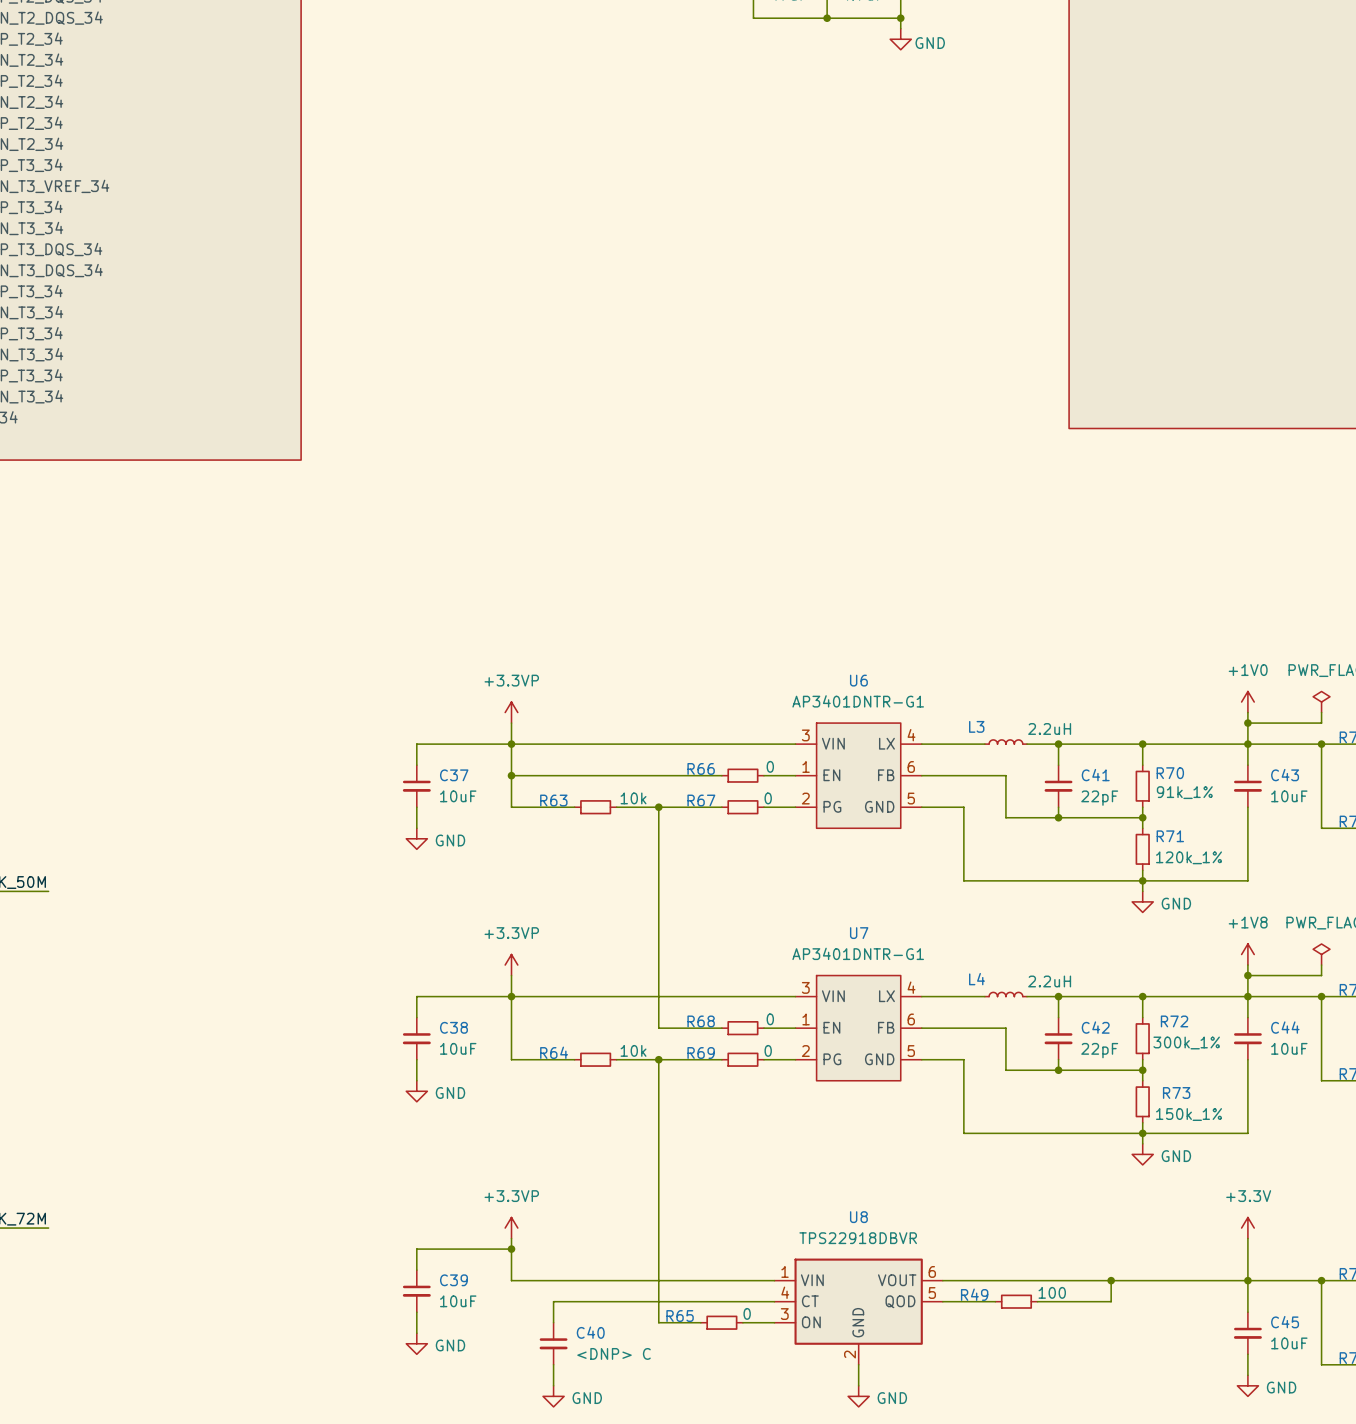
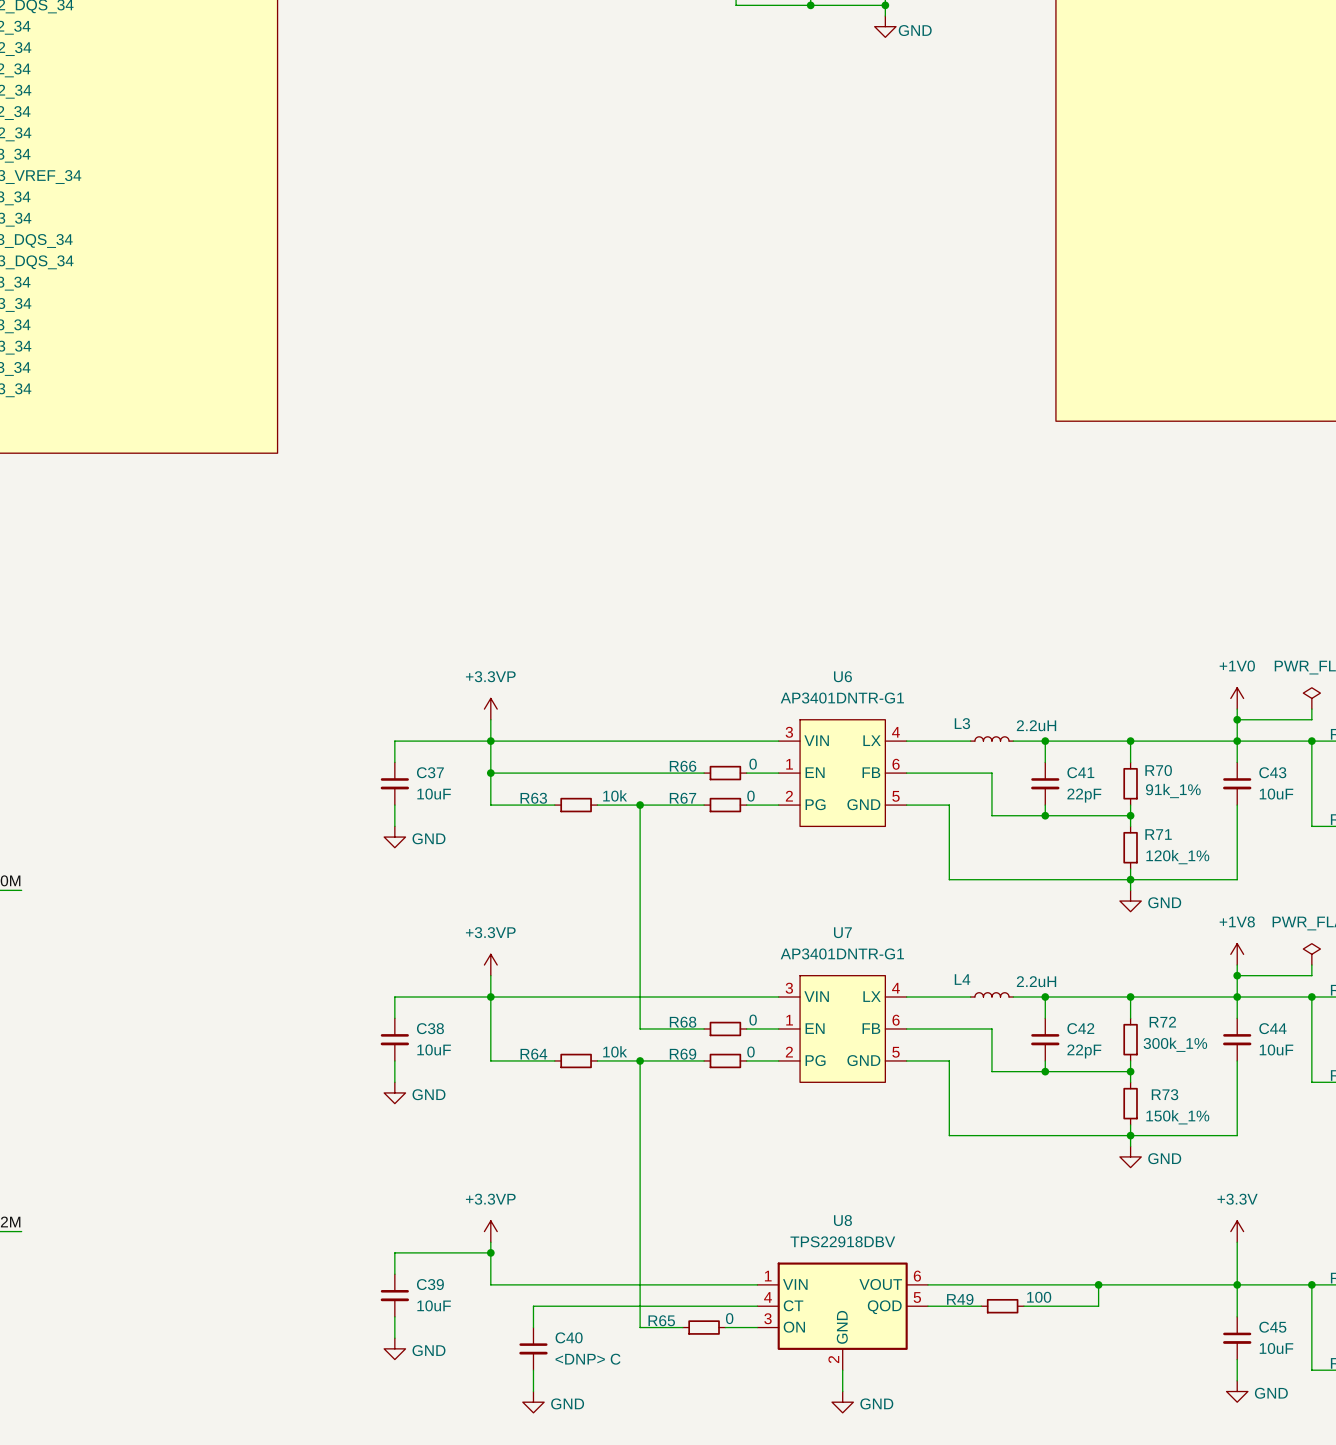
U8 value: TPS22918DBVR (858, 1238) -> TPS22918DBV (842, 1241)

